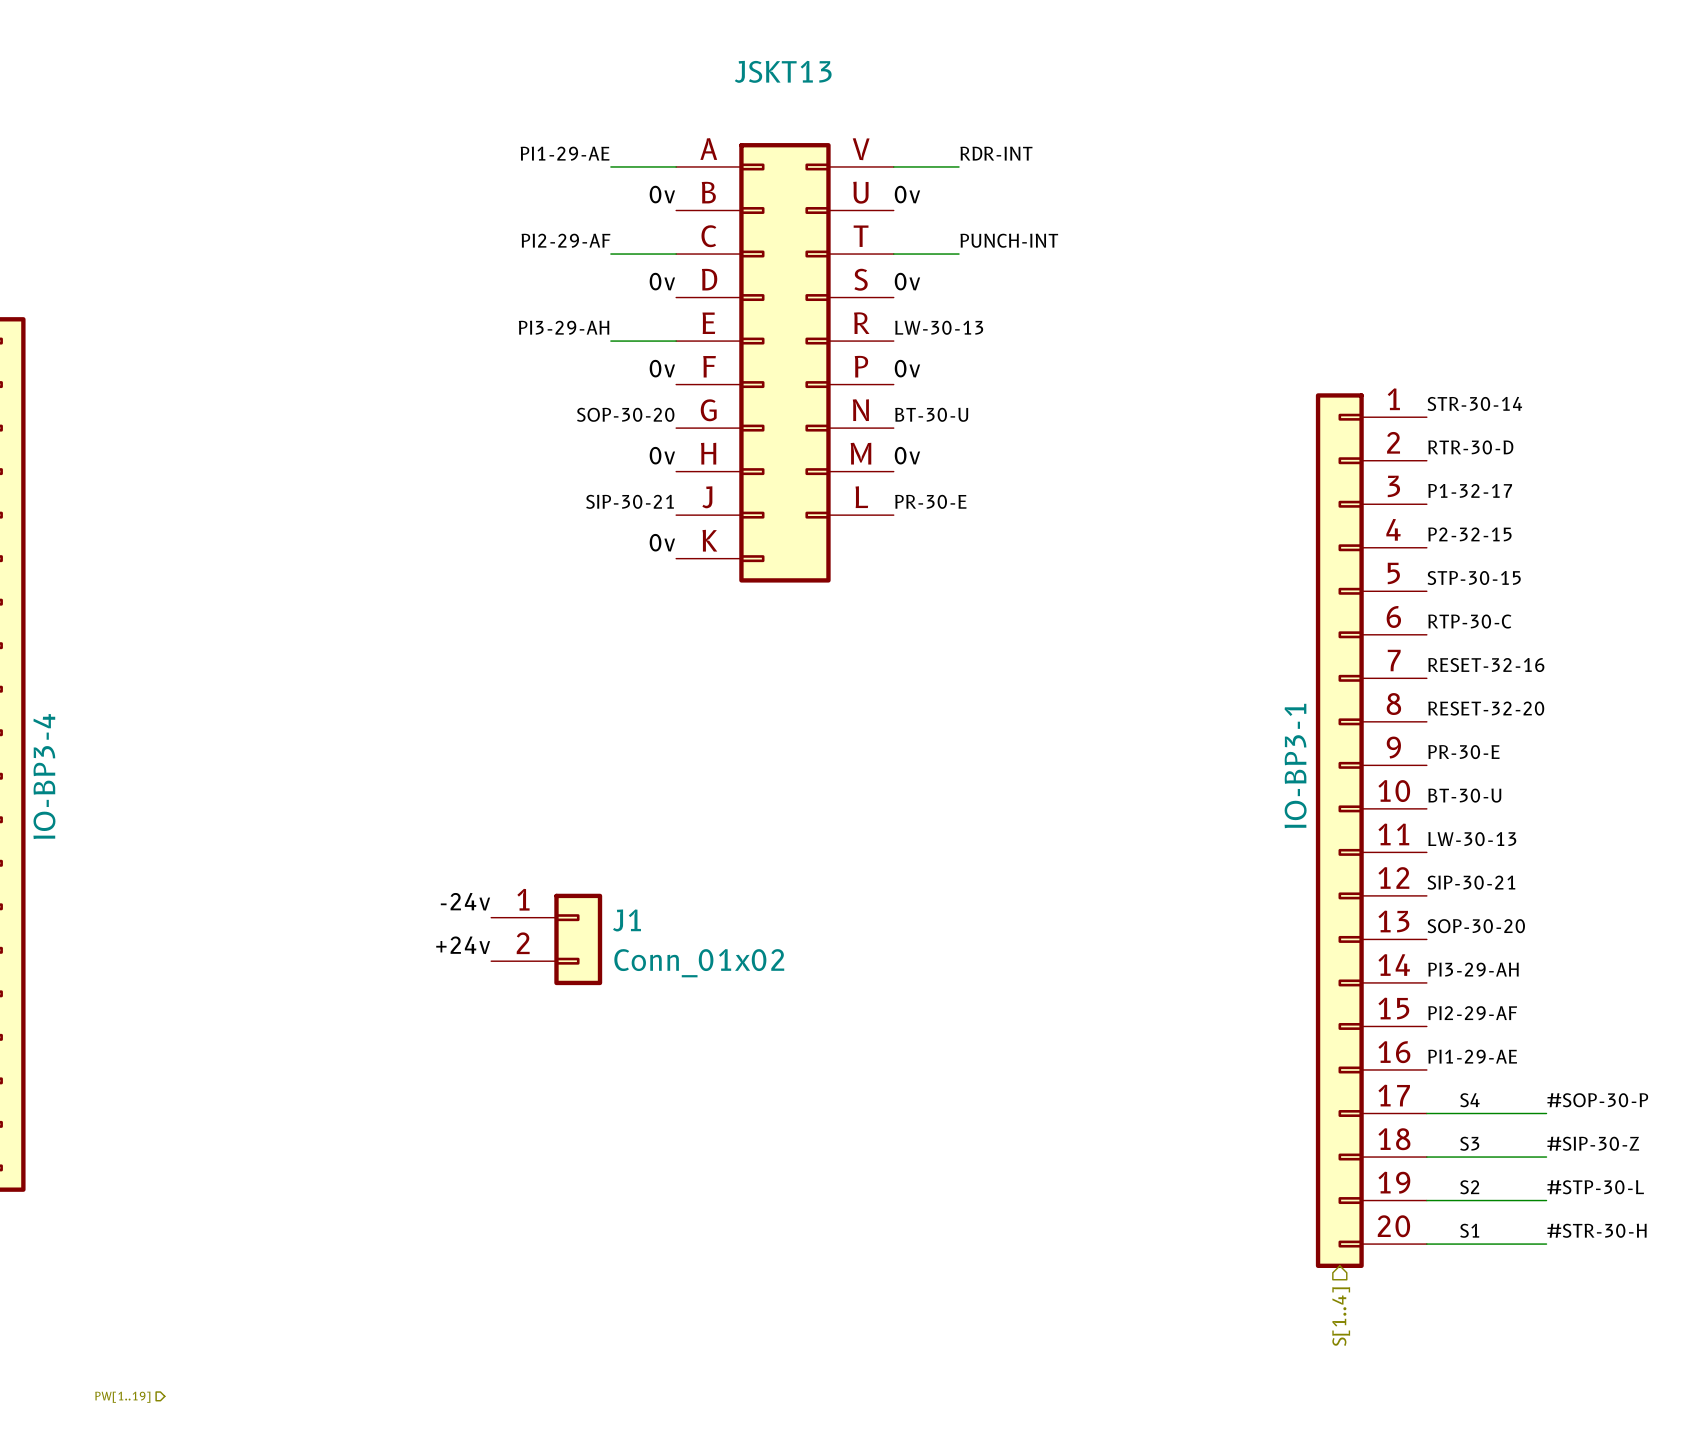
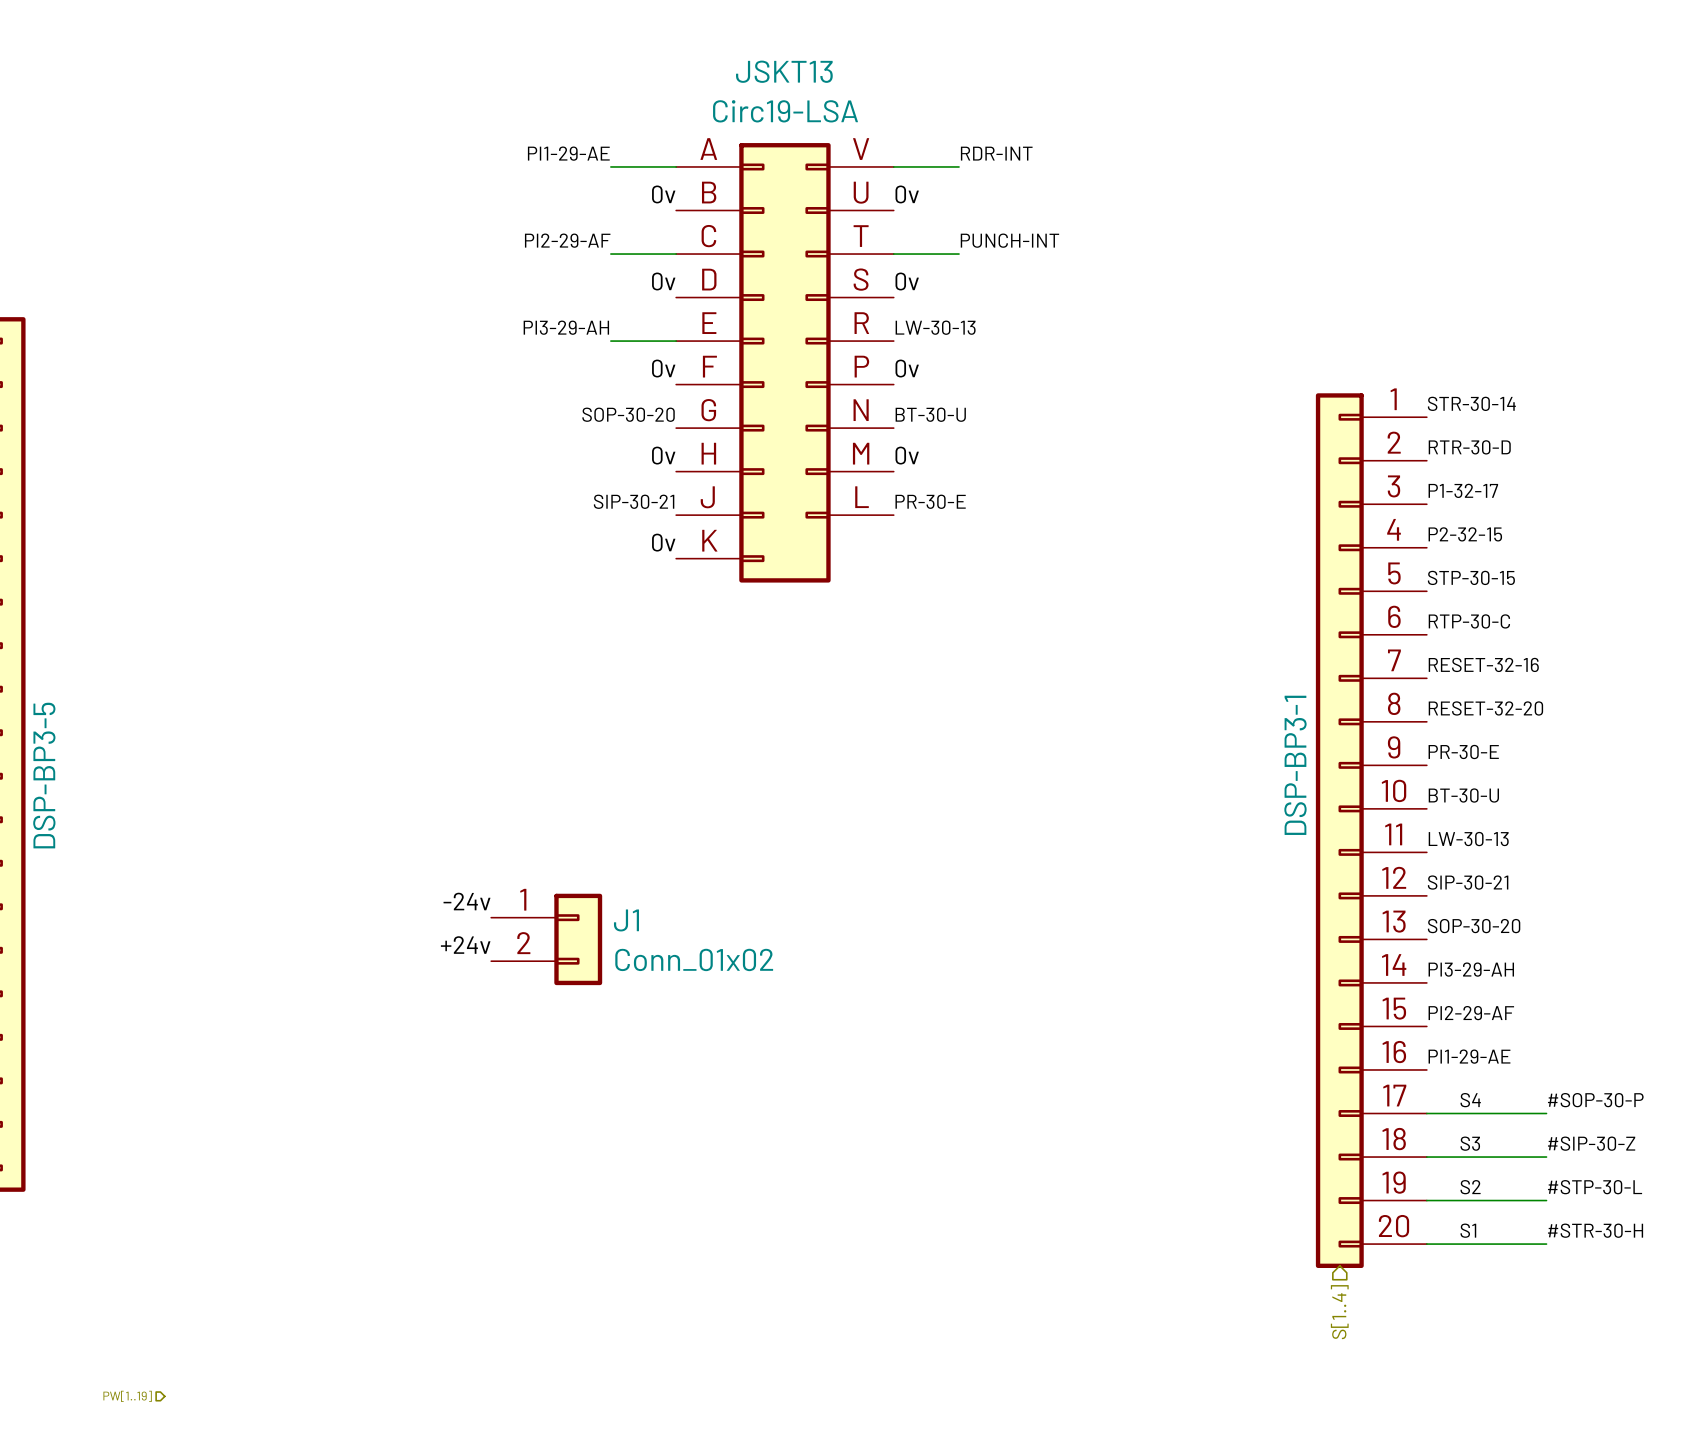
JSKT13 value: none -> Circ19-LSA (785, 111)
IO-BP3-1 name: IO-BP3-1 (1295, 766) -> DSP-BP3-1 (1295, 765)
IO-BP3-4 name: IO-BP3-4 (44, 776) -> DSP-BP3-5 (44, 775)

